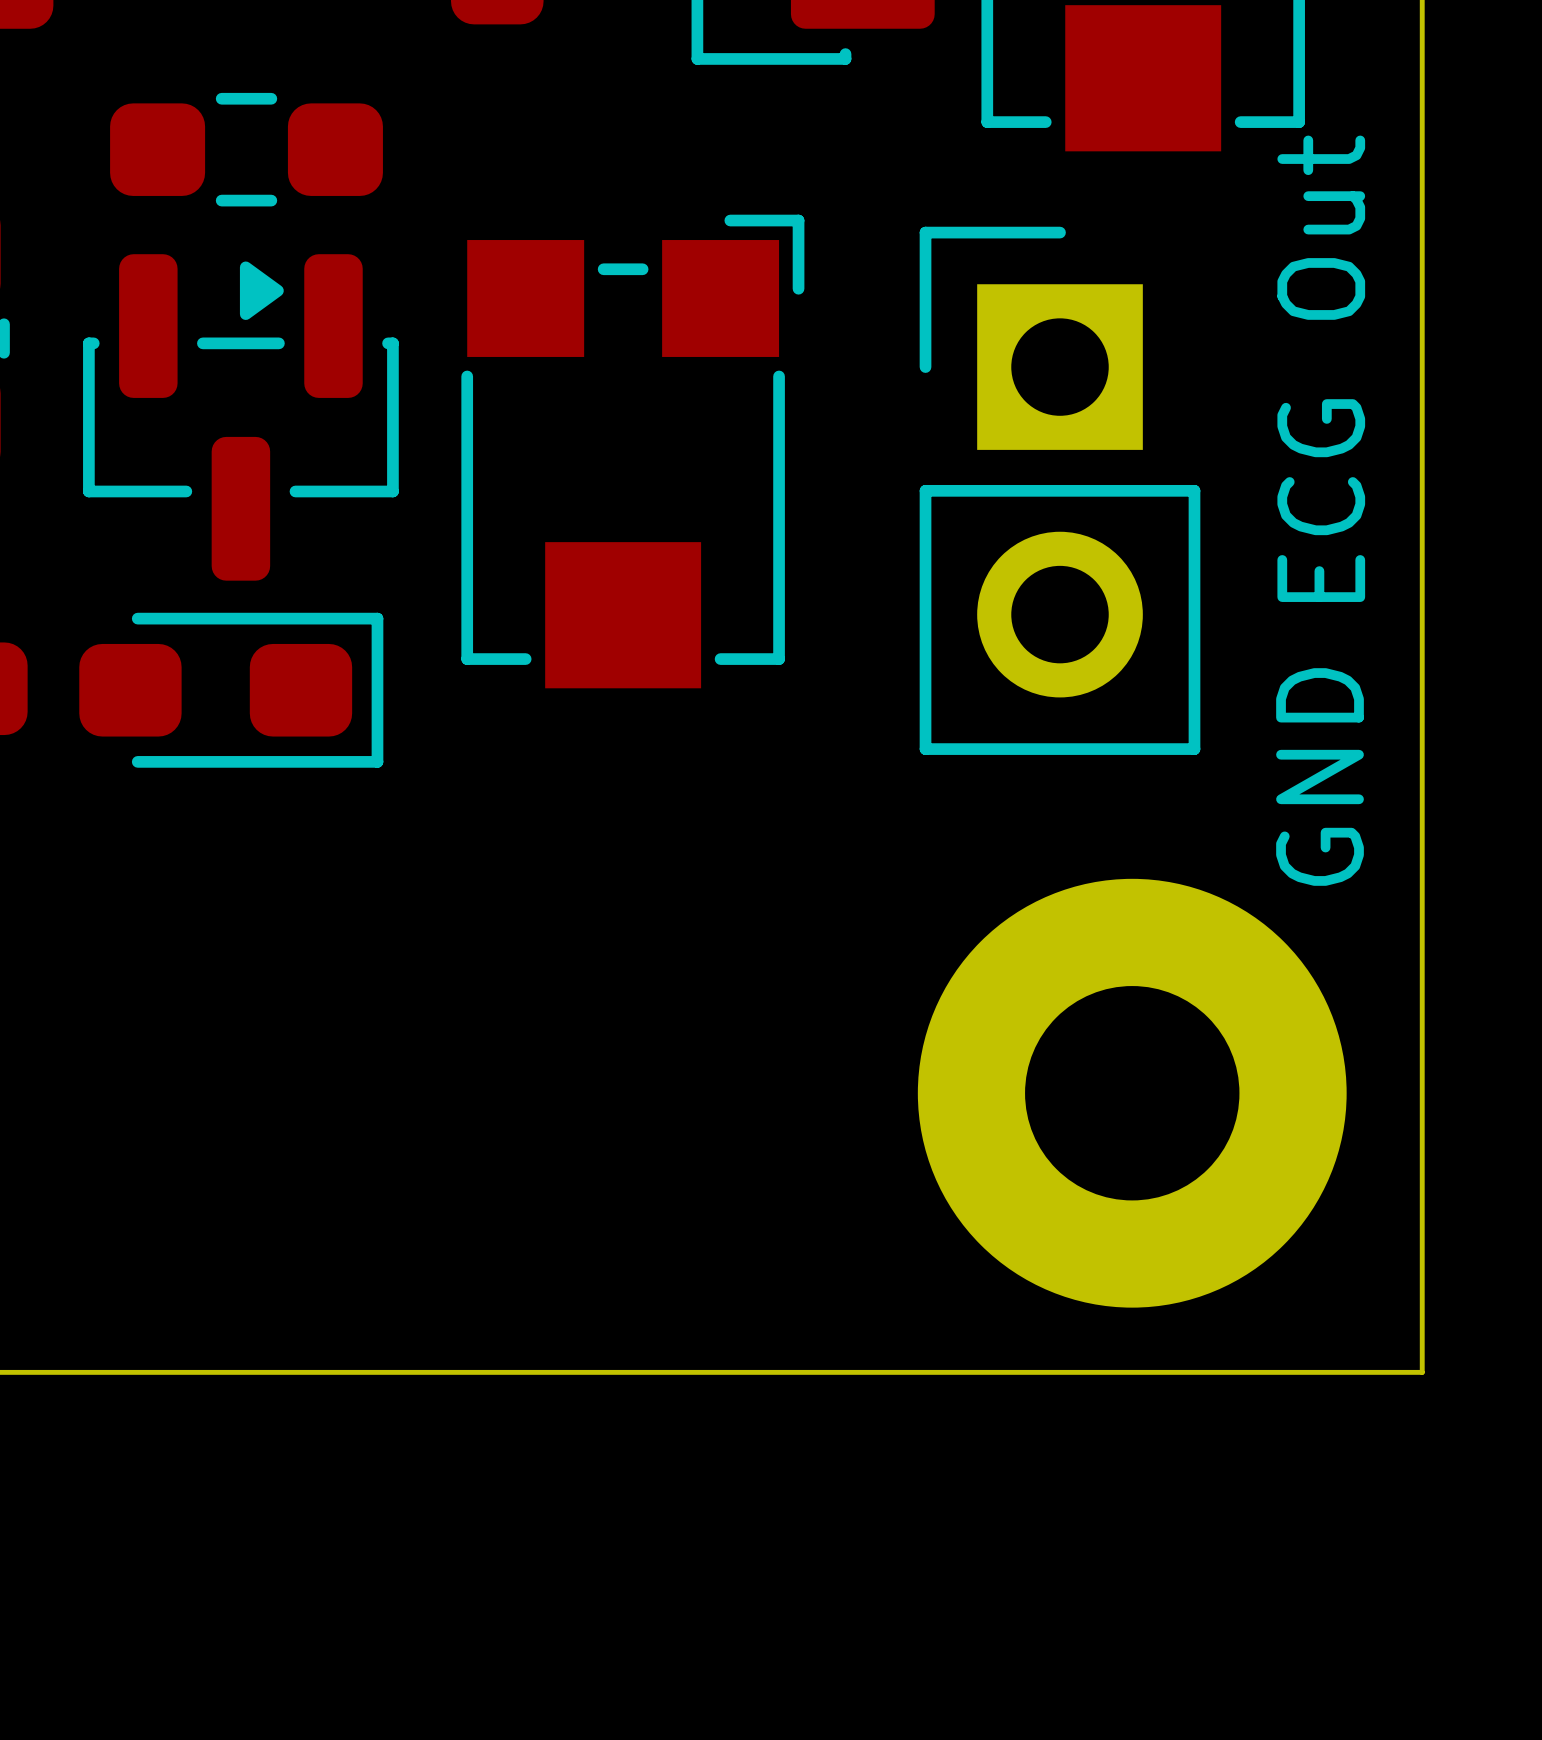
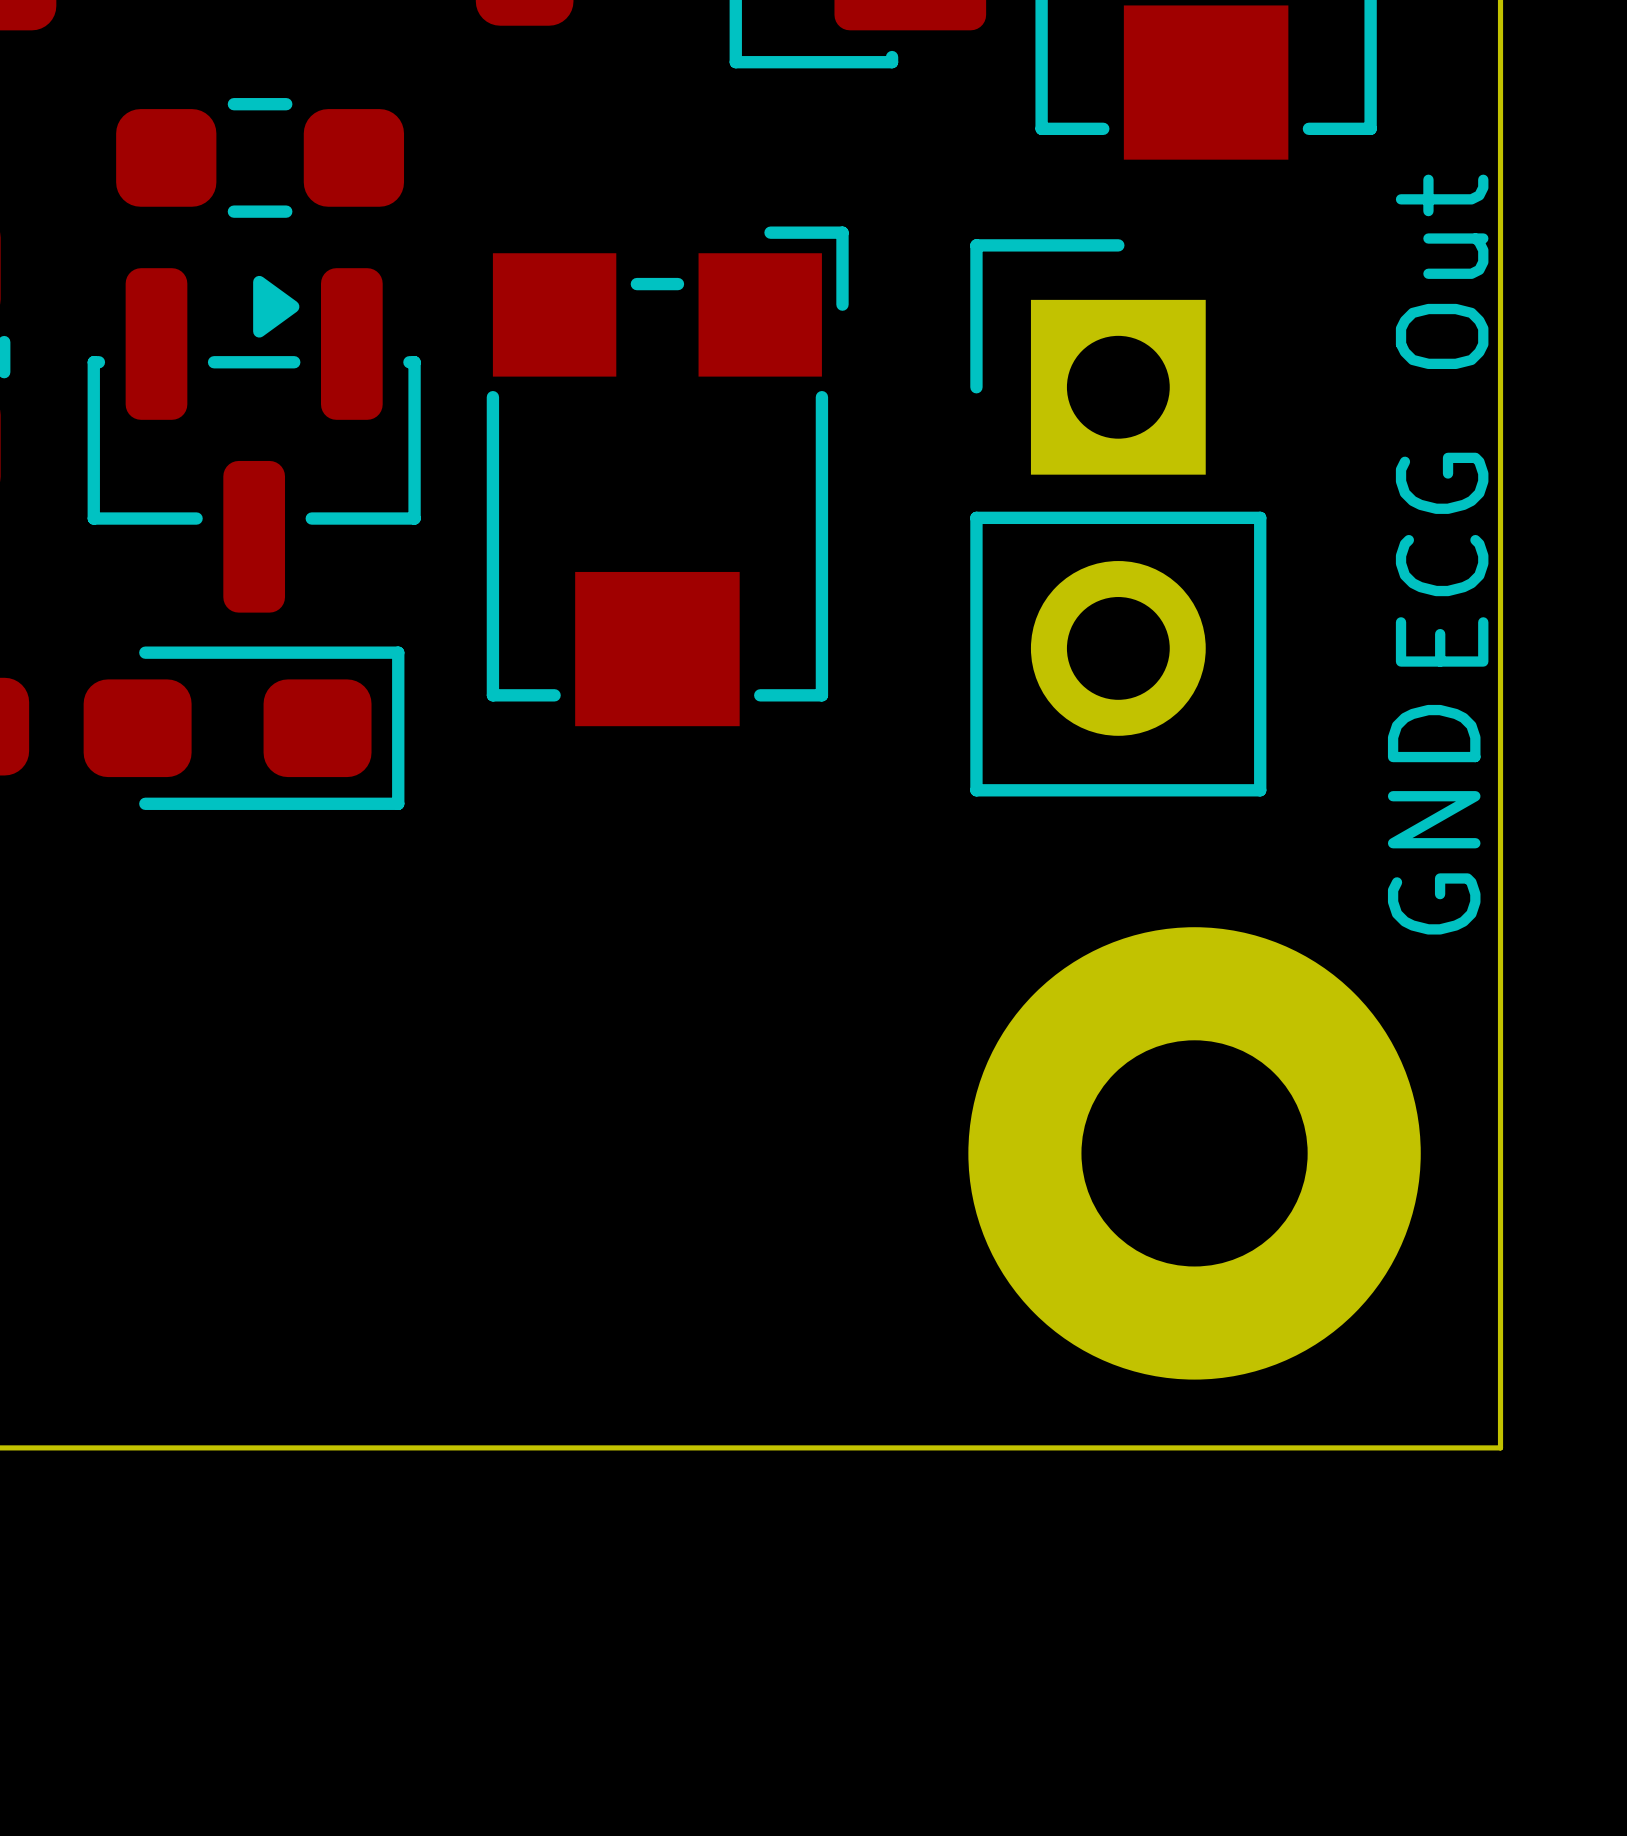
text position: ECG Out (1321, 368) -> ECG Out (1442, 420)
text position: GND (1320, 776) -> GND (1434, 819)

